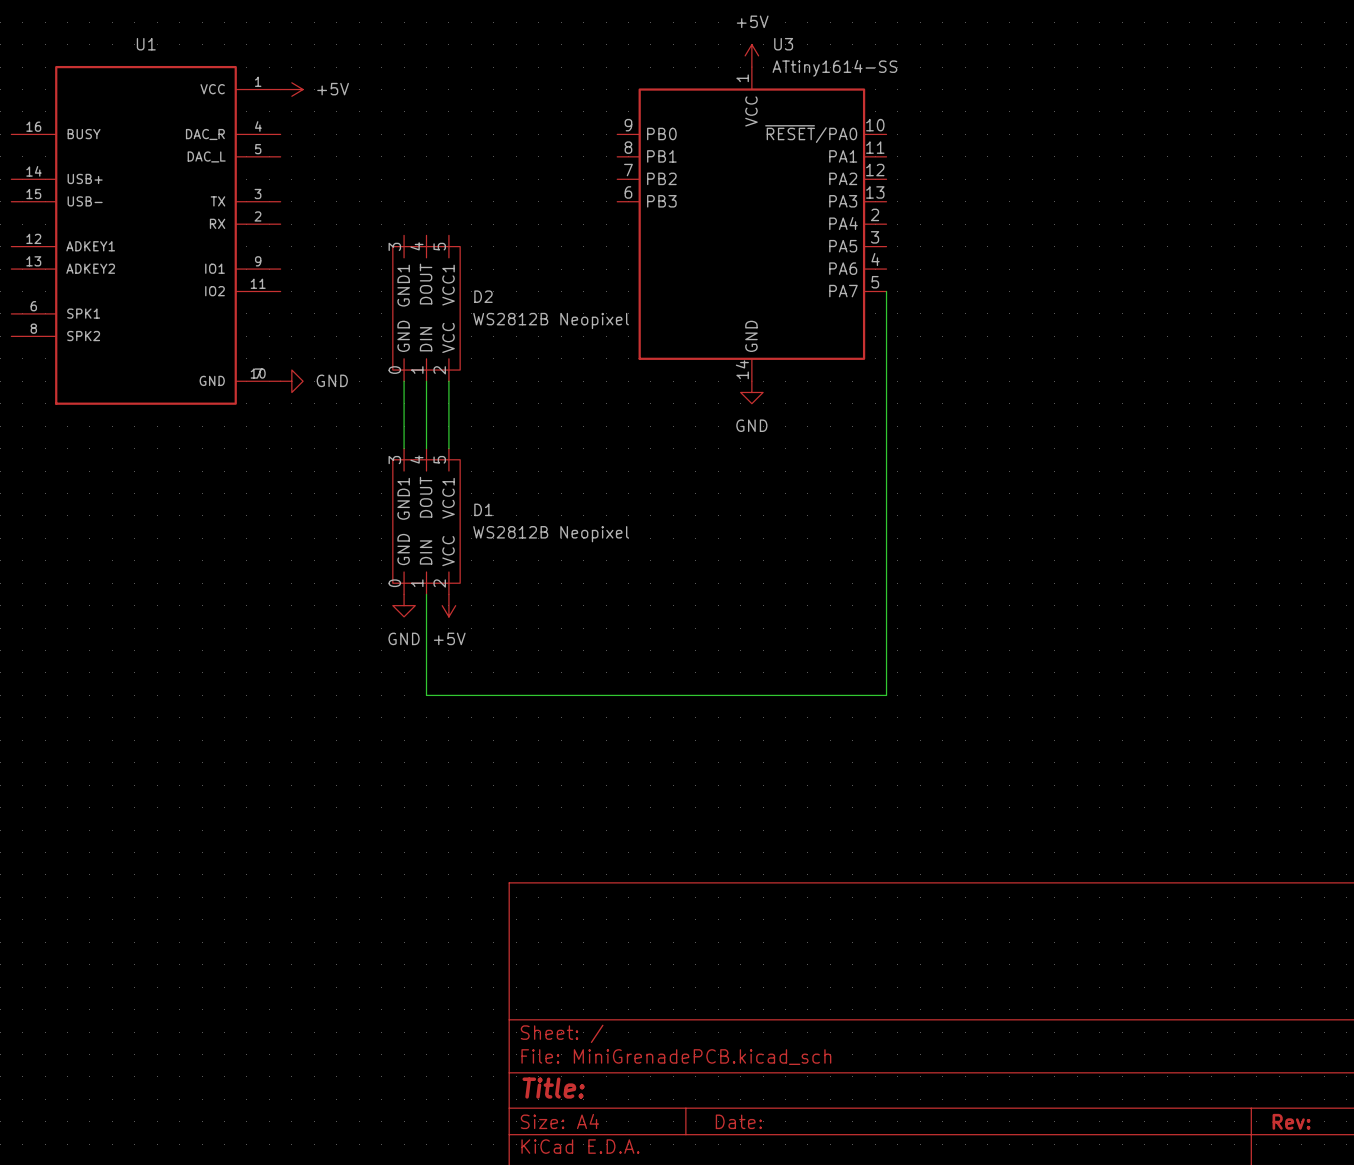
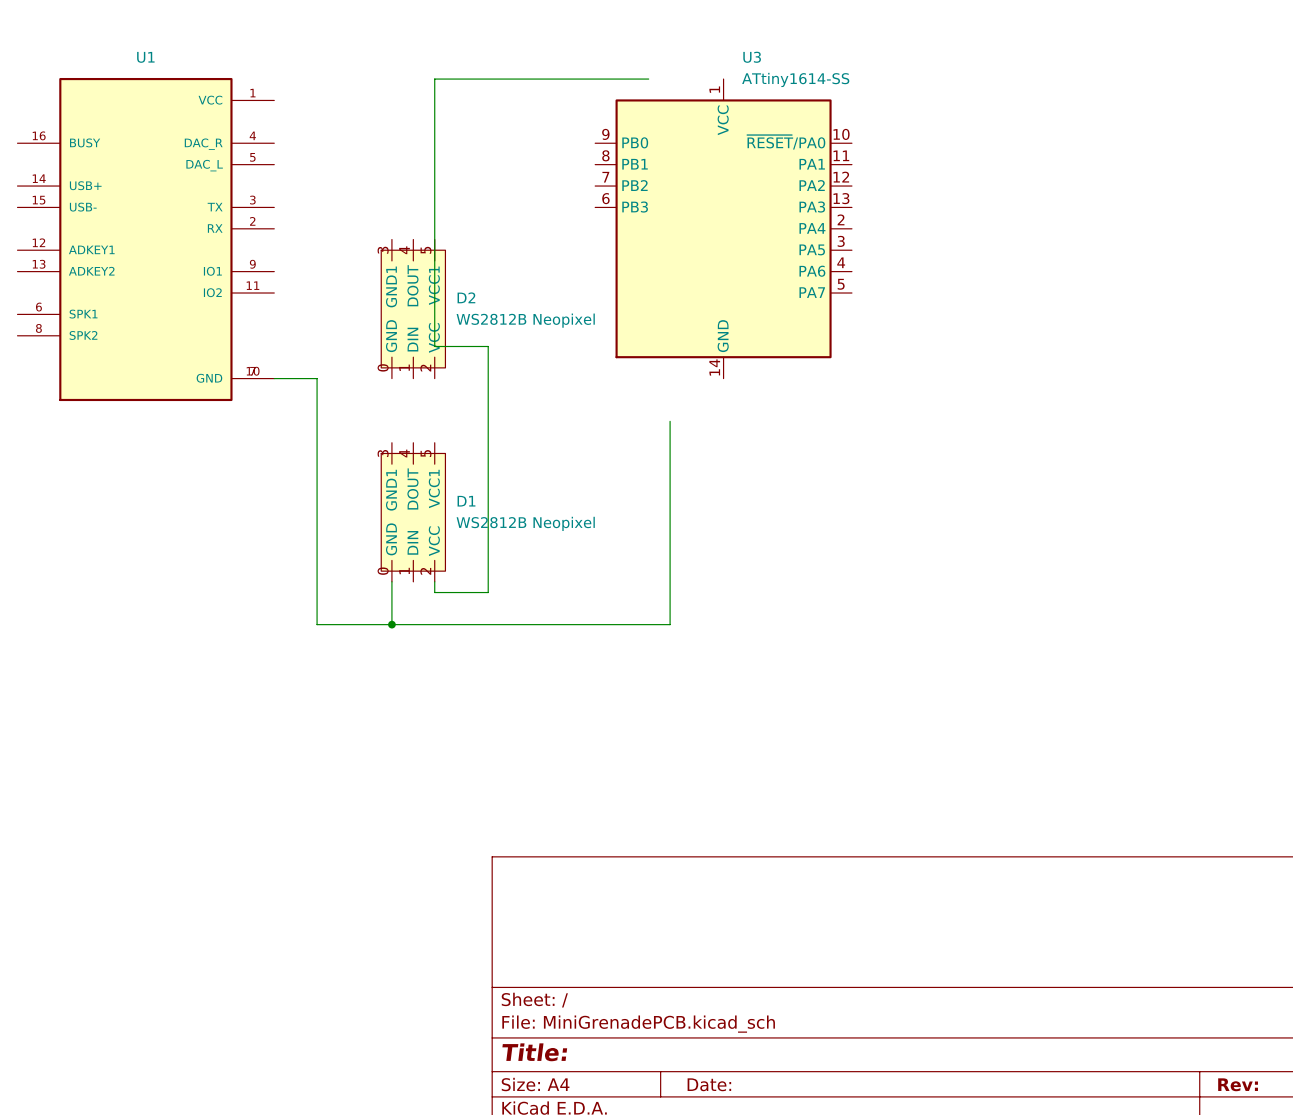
power symbol: +5V (751, 55) -> none
wire: none -> (648, 79) (434, 79) (434, 346) (488, 346) (488, 592) (434, 592) (434, 581)
power symbol: +5V (291, 89) -> none
wire: (886, 291) (886, 695) (426, 695) (426, 594) -> none
wire: none -> (274, 378) (317, 378) (317, 624) (670, 624) (670, 421)
power symbol: GND (291, 381) -> none
wire: (404, 381) (404, 448) -> none
wire: (426, 381) (426, 448) -> none
wire: (448, 381) (448, 448) -> none
power symbol: GND (751, 392) -> none
wire: none -> (391, 581) (391, 624)
power symbol: GND (404, 605) -> none
power symbol: +5V (448, 605) -> none
junction: none -> (391, 624)

